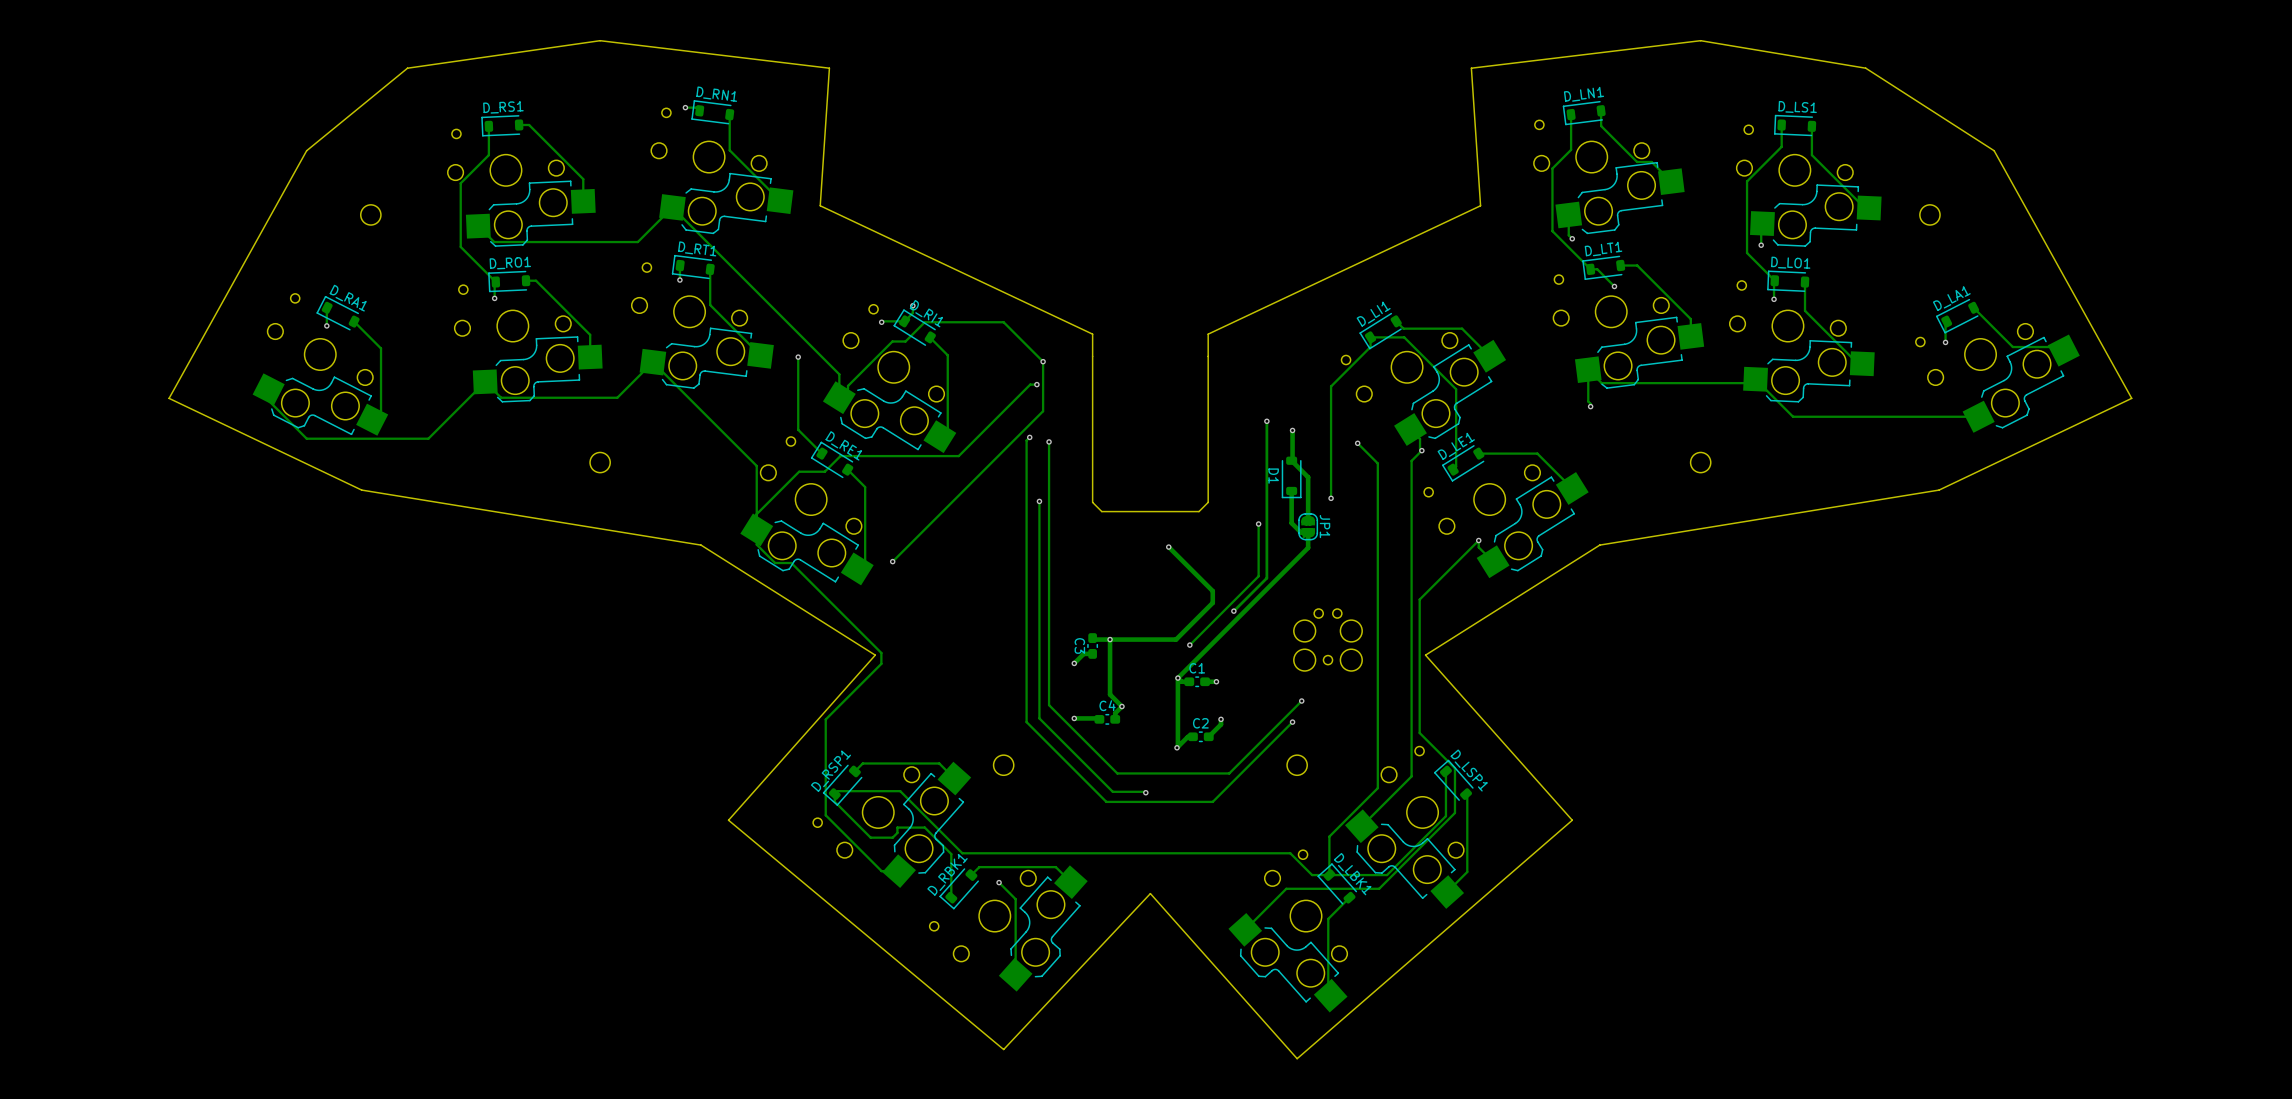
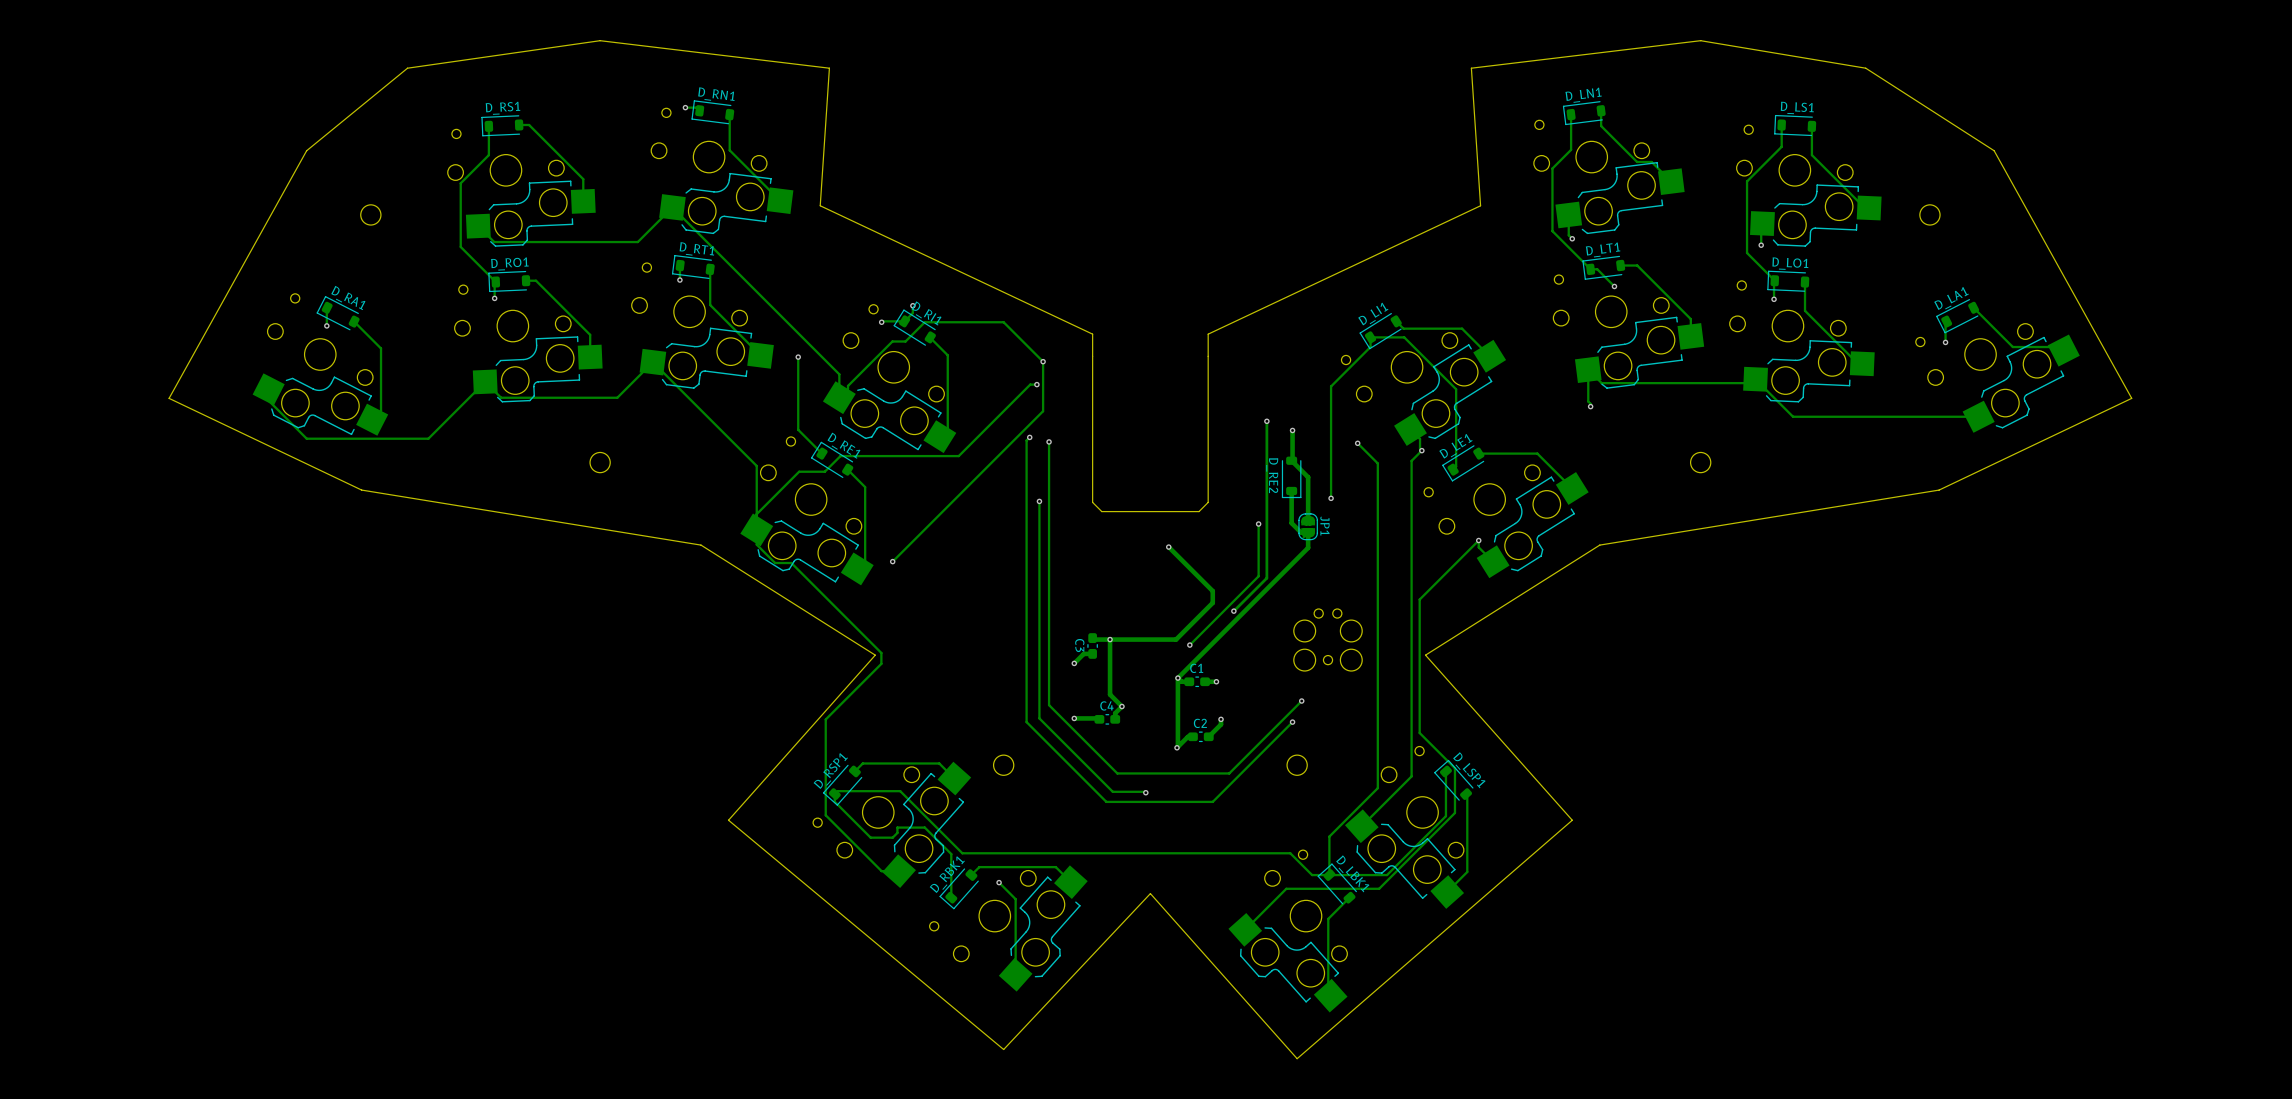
D1 name: D1 (1273, 476) -> D_RE2 (1272, 475)

